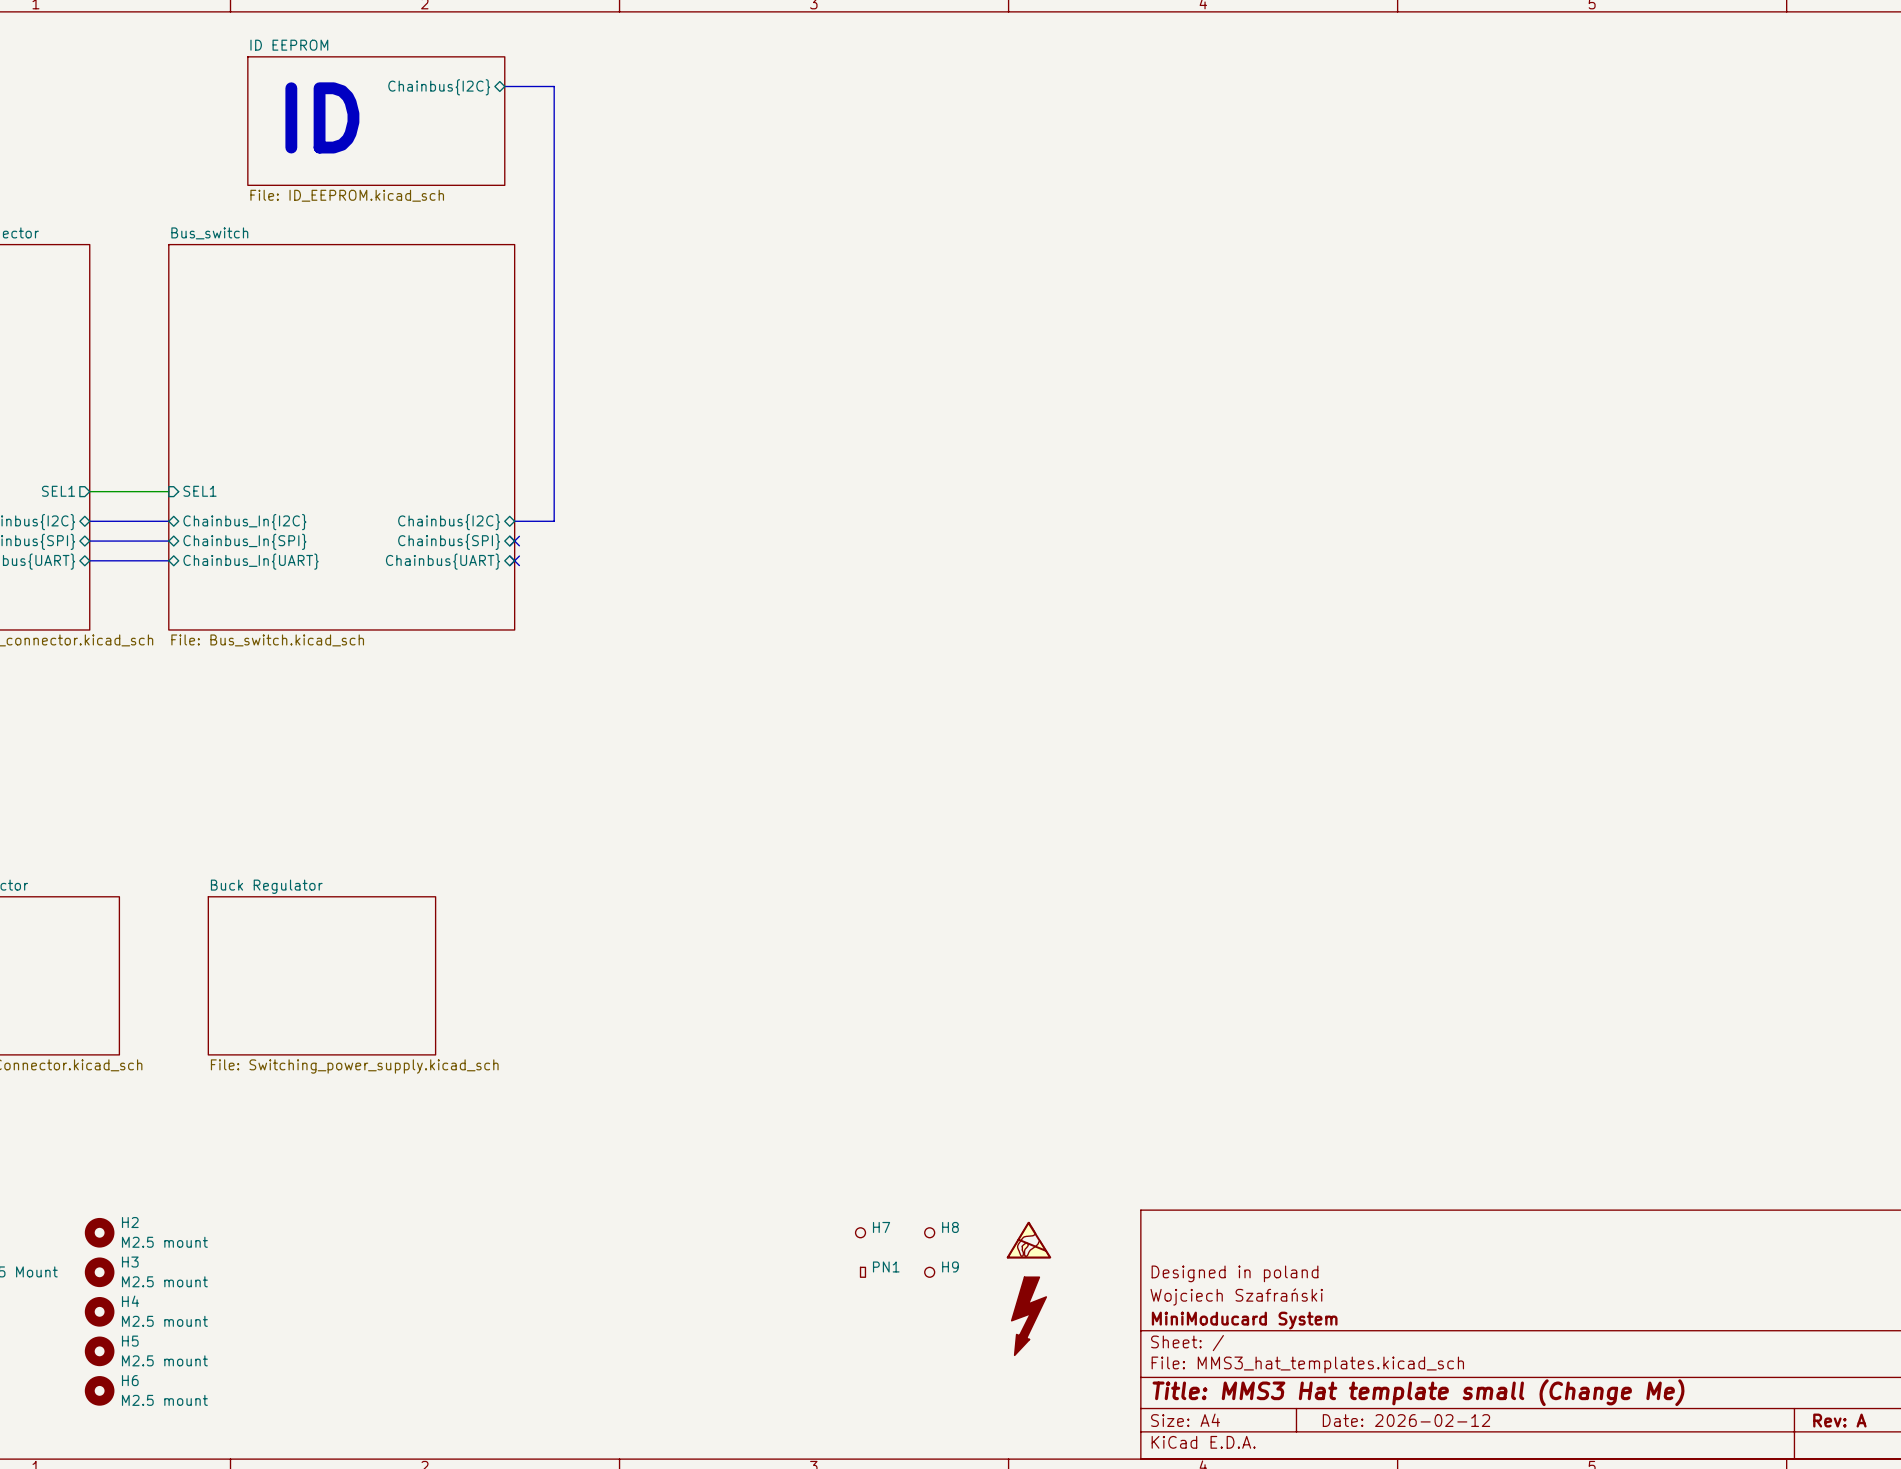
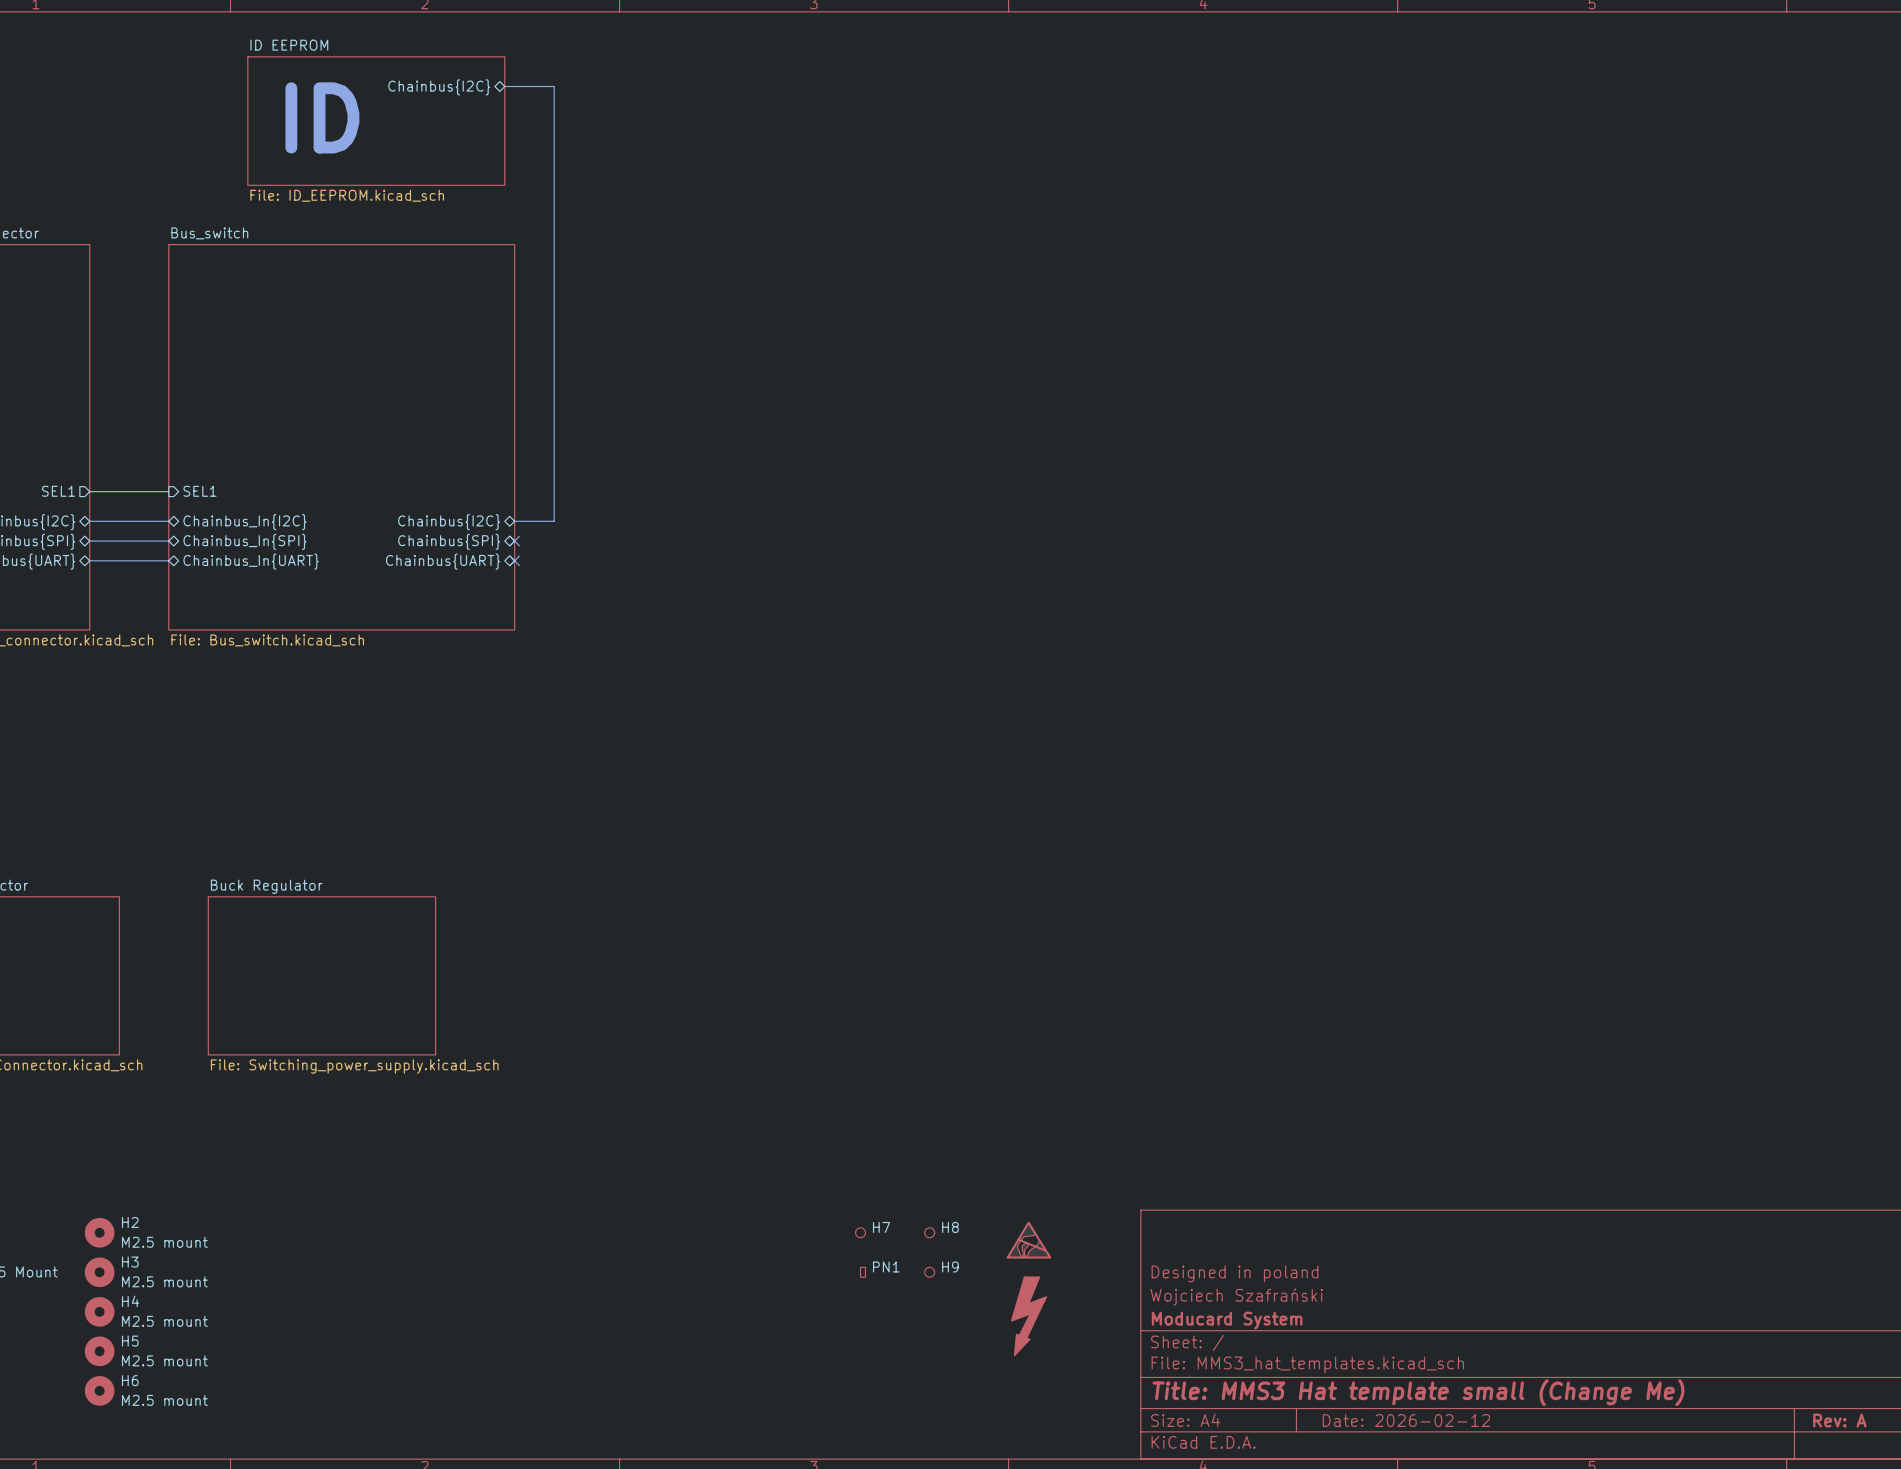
title block: MiniModucard System (1244, 1320) -> Moducard System (1227, 1320)

